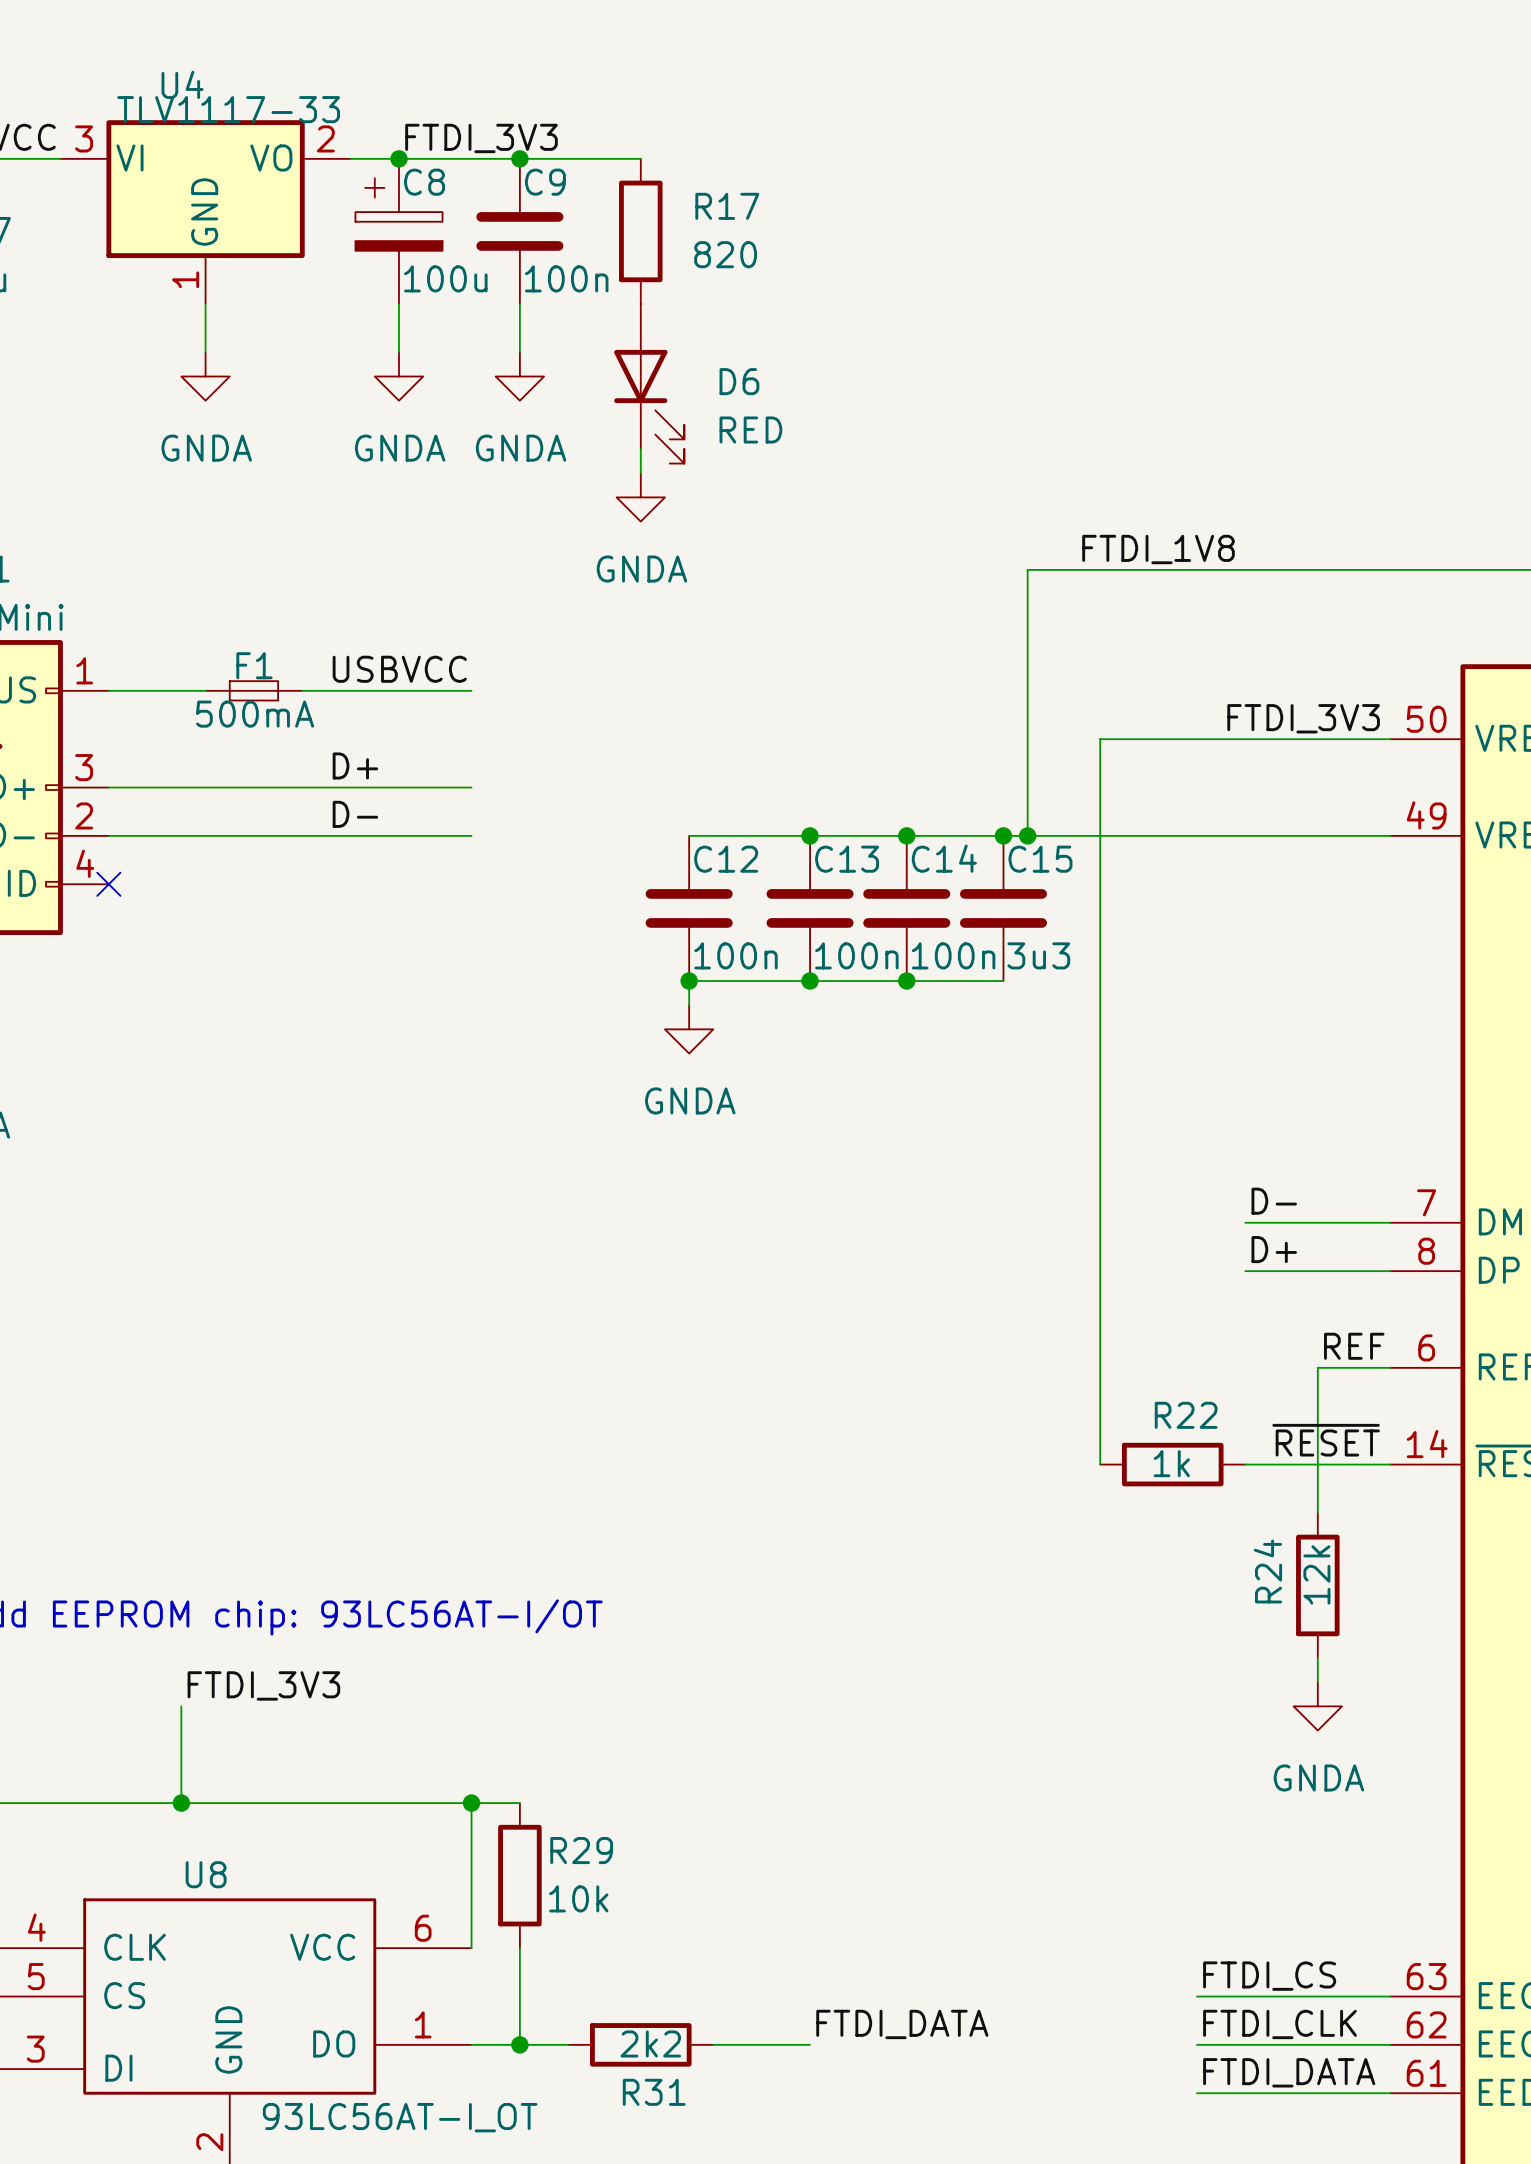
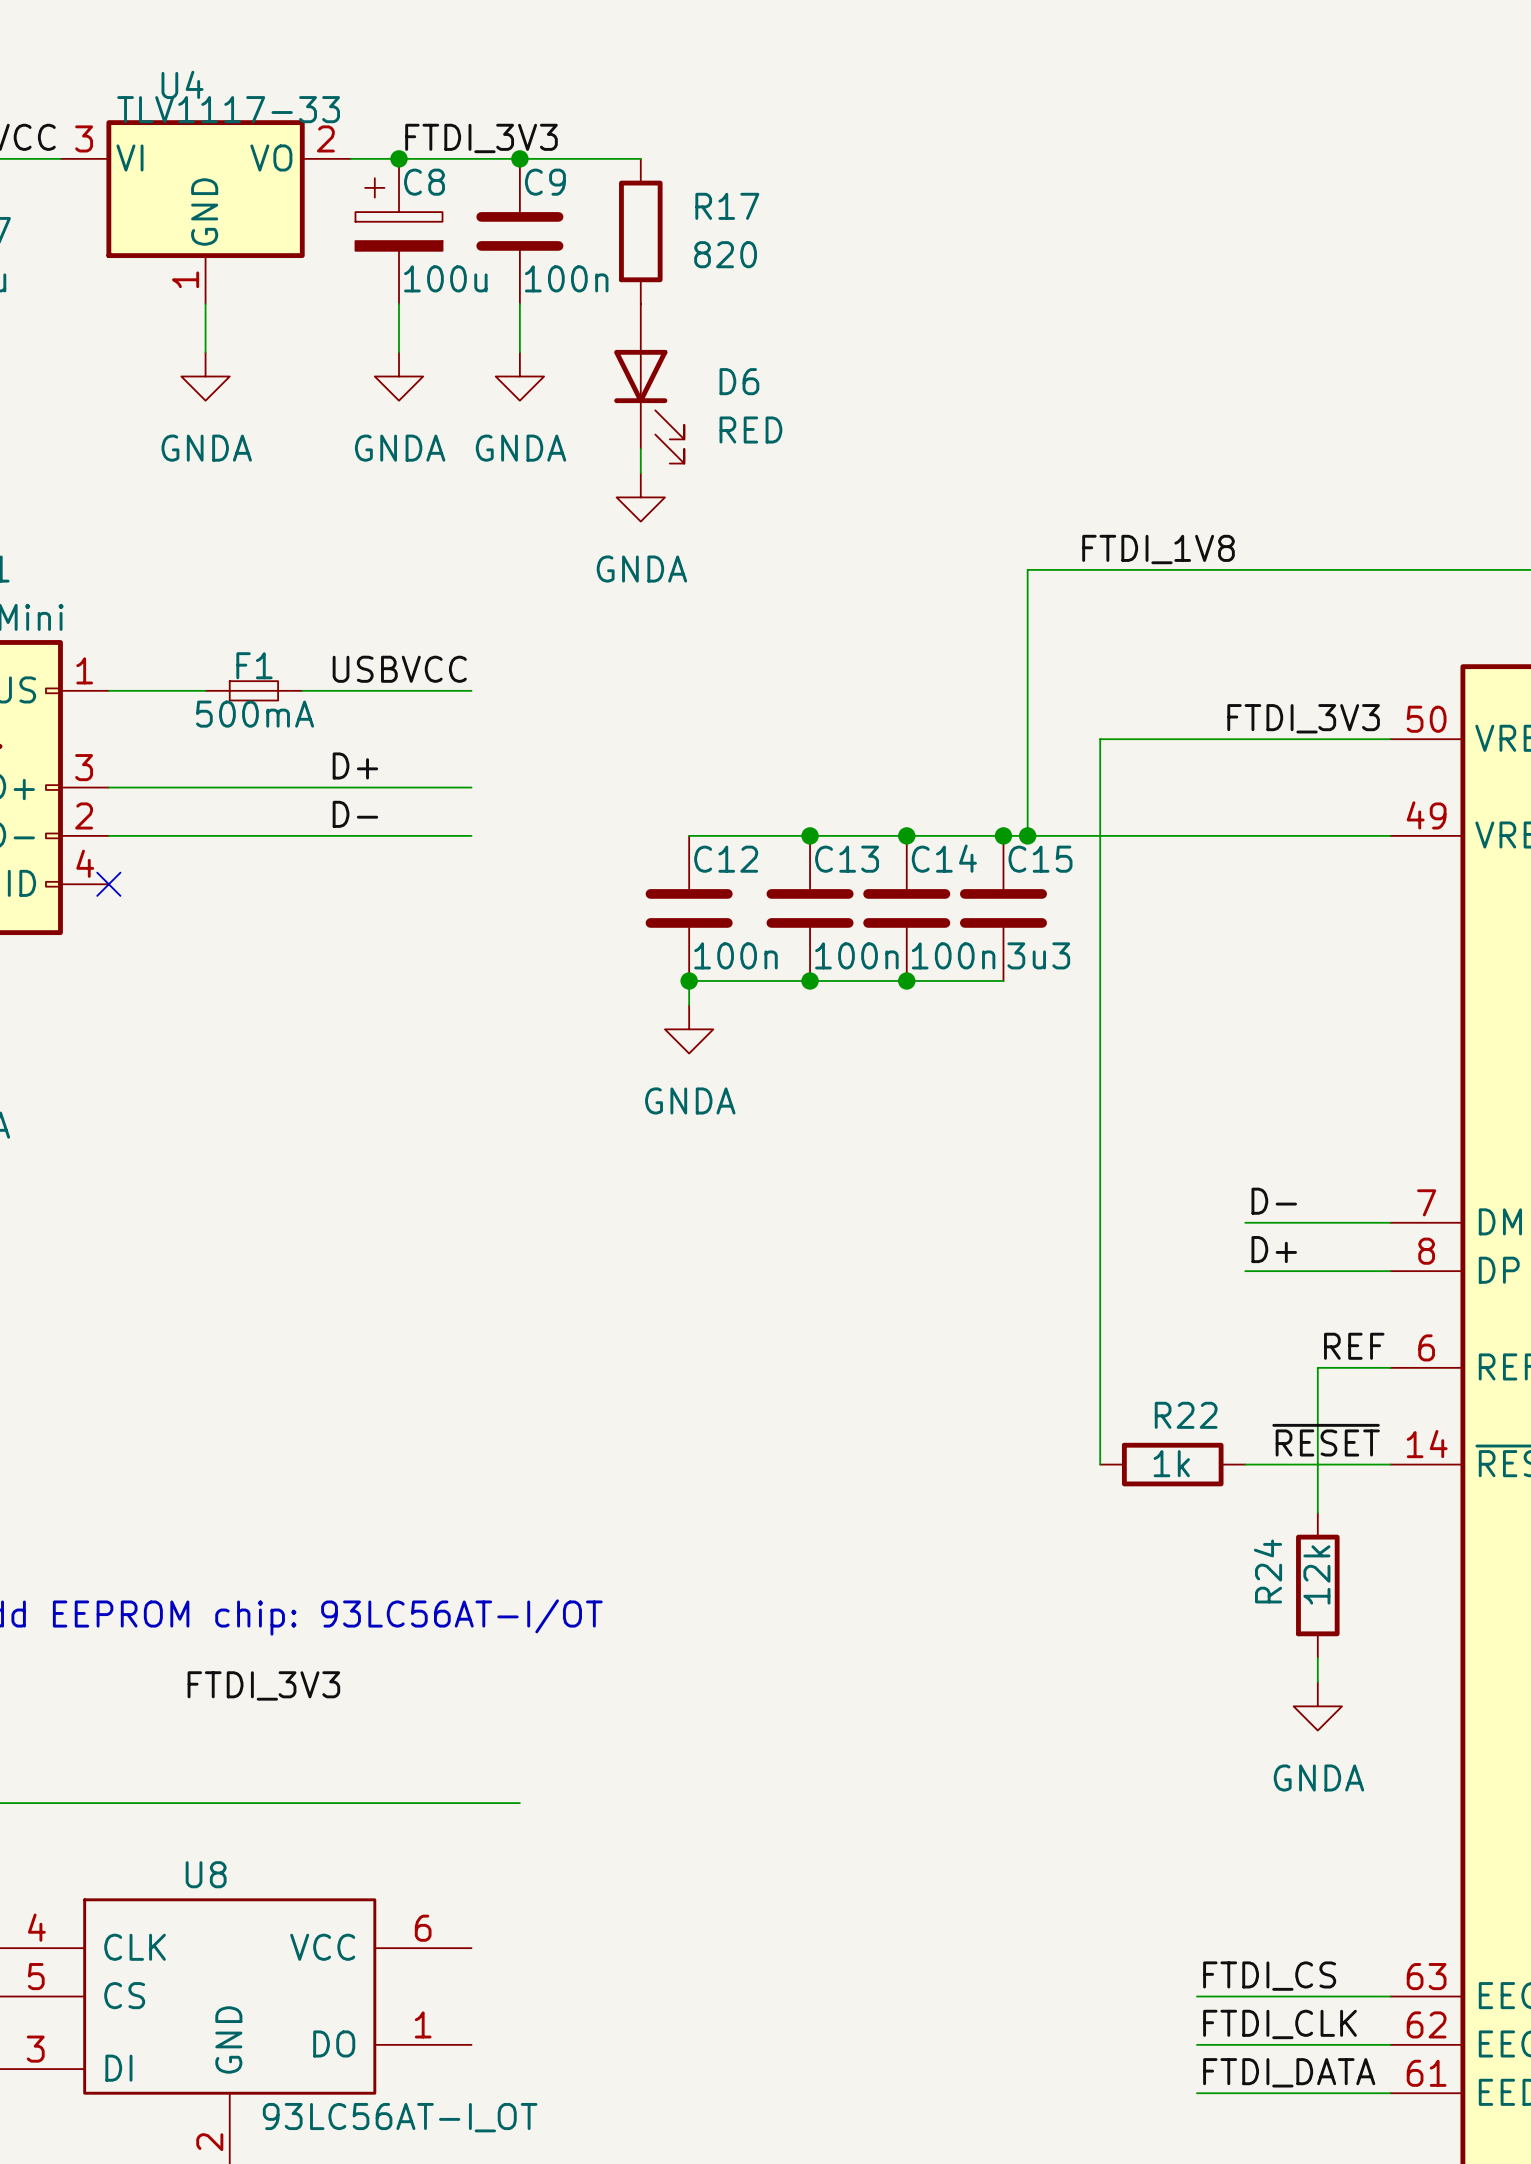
wire: (181, 1706) (181, 1803) -> none
junction: (181, 1803) -> none
wire: (471, 1803) (471, 1948) -> none
junction: (471, 1803) -> none
R29: 10k (519, 1875) -> none
wire: (519, 1948) (519, 2044) -> none
label: FTDI_DATA (902, 2024) -> none
wire: (471, 2044) (568, 2044) -> none
junction: (519, 2044) -> none
R31: 2k2 (640, 2044) -> none
wire: (713, 2044) (810, 2044) -> none

